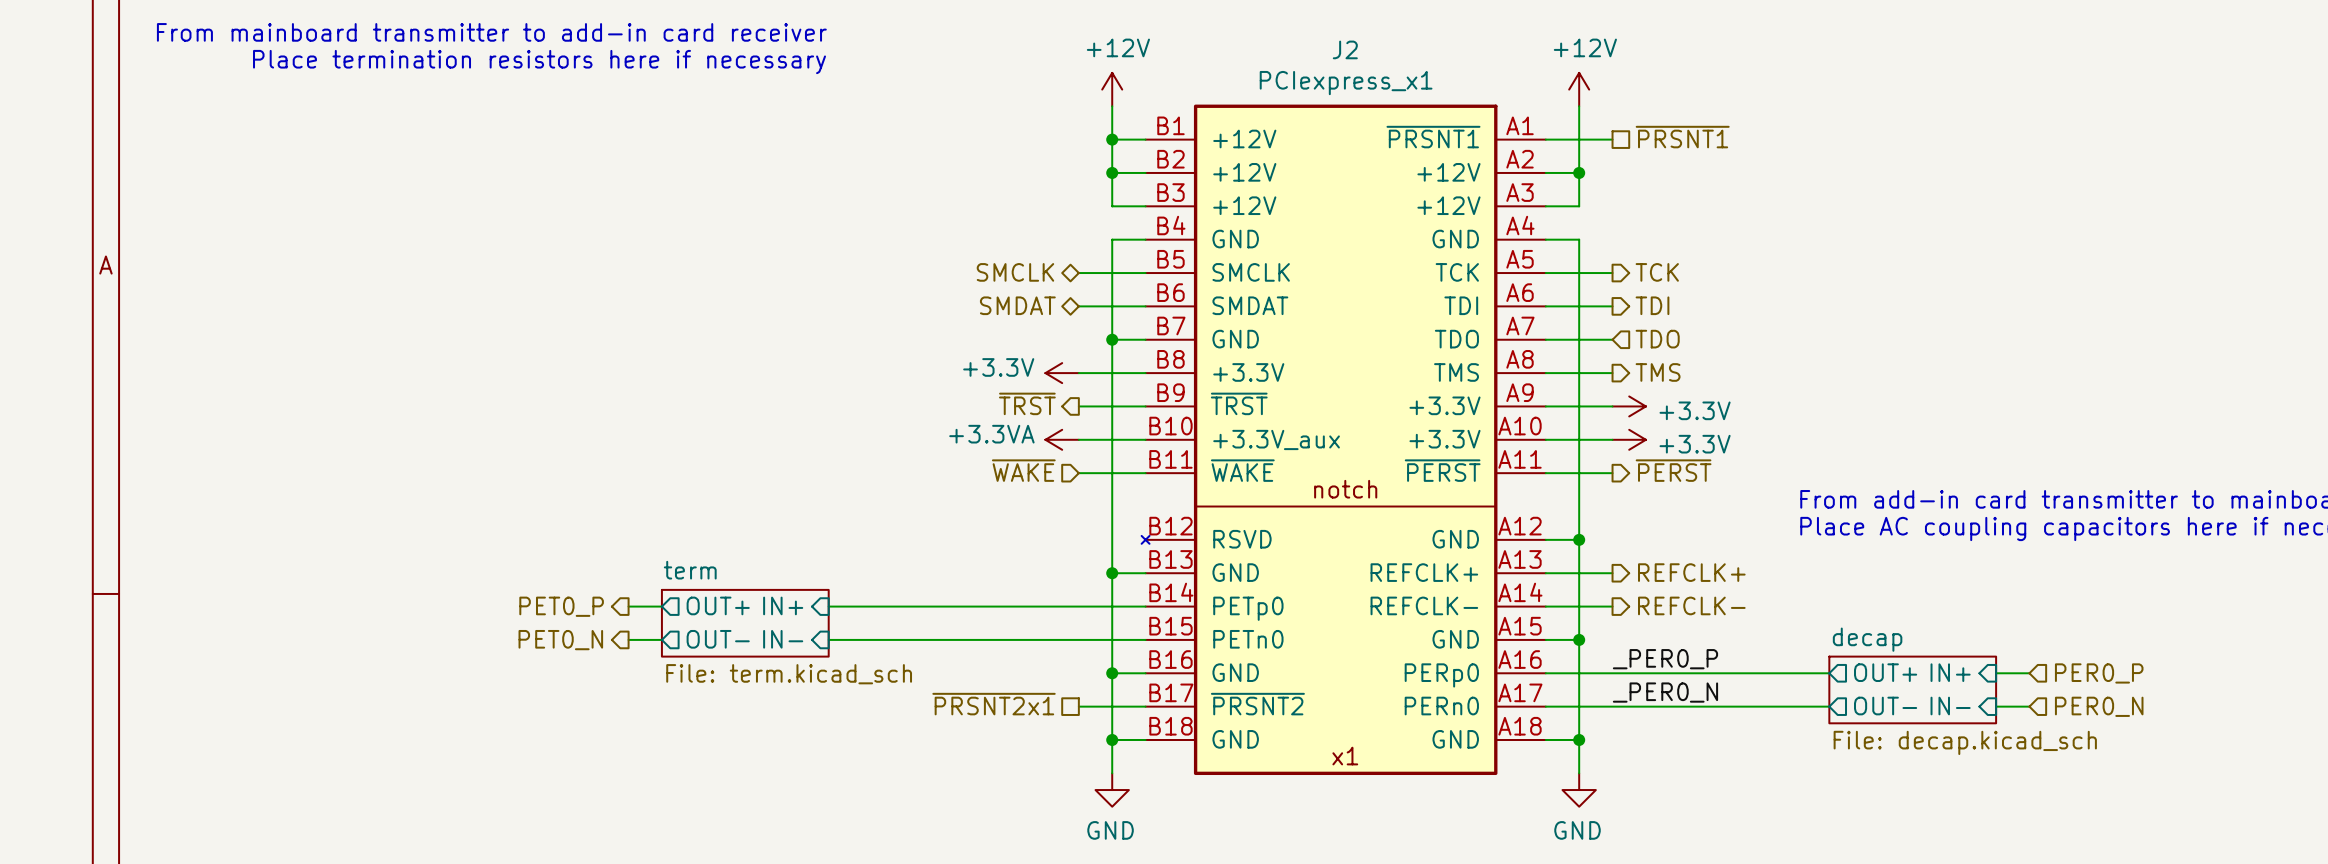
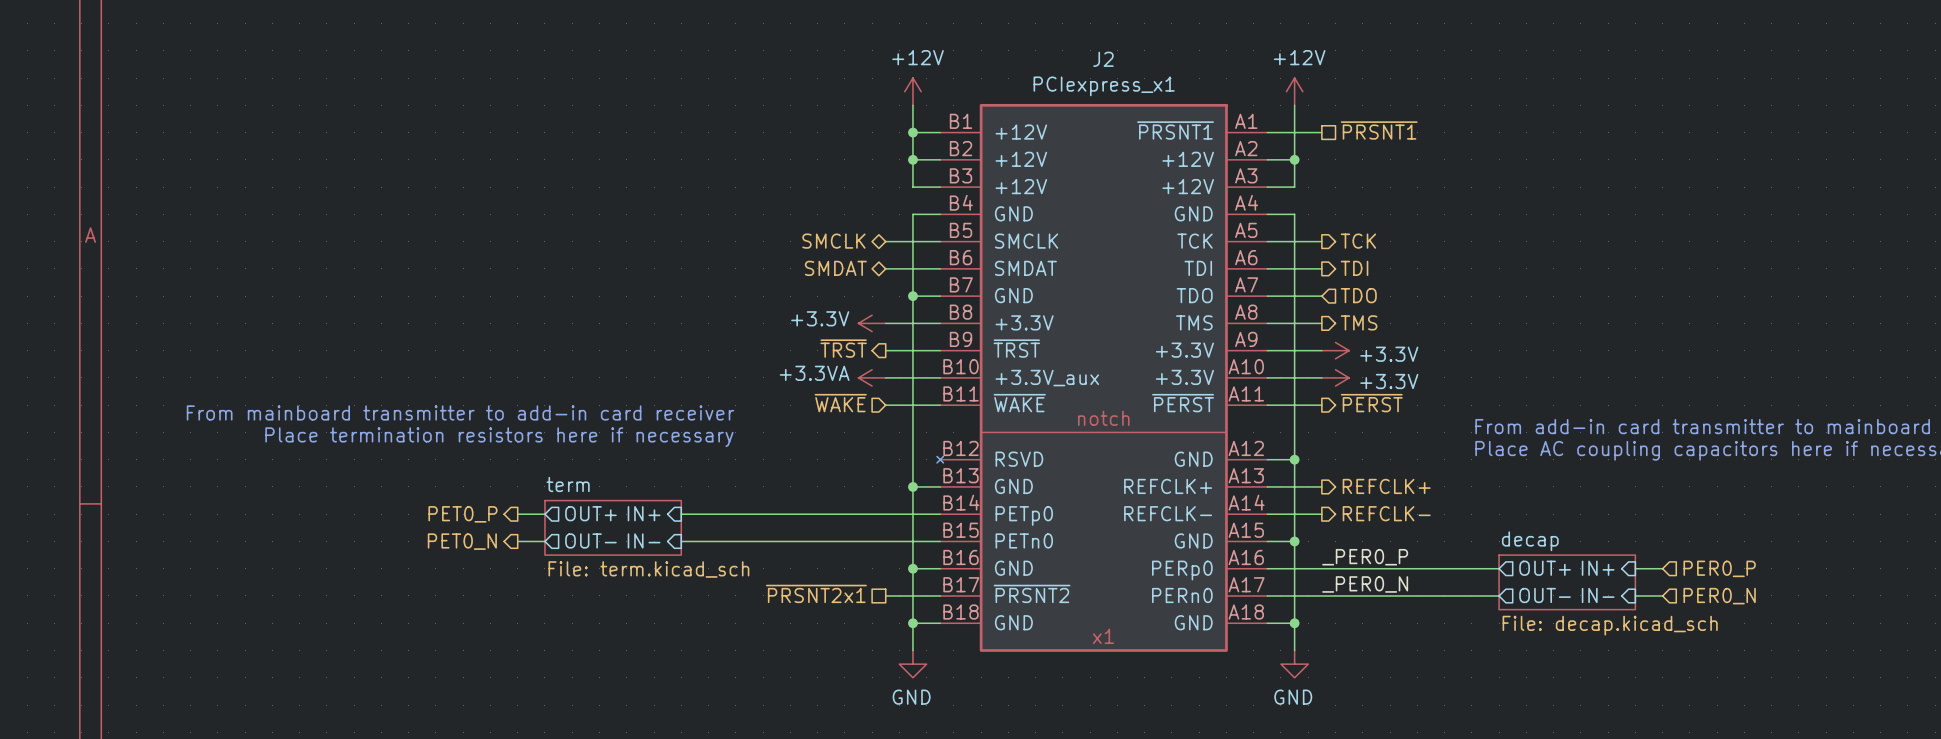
text: From mainboard transmitter to add-in card receiver (491, 32) -> none
text: Place termination resistors here if necessary (539, 62) -> none
text: none -> From mainboard transmitter to add-in card receiver (460, 412)
text: none -> Place termination resistors here if necessary (499, 437)

